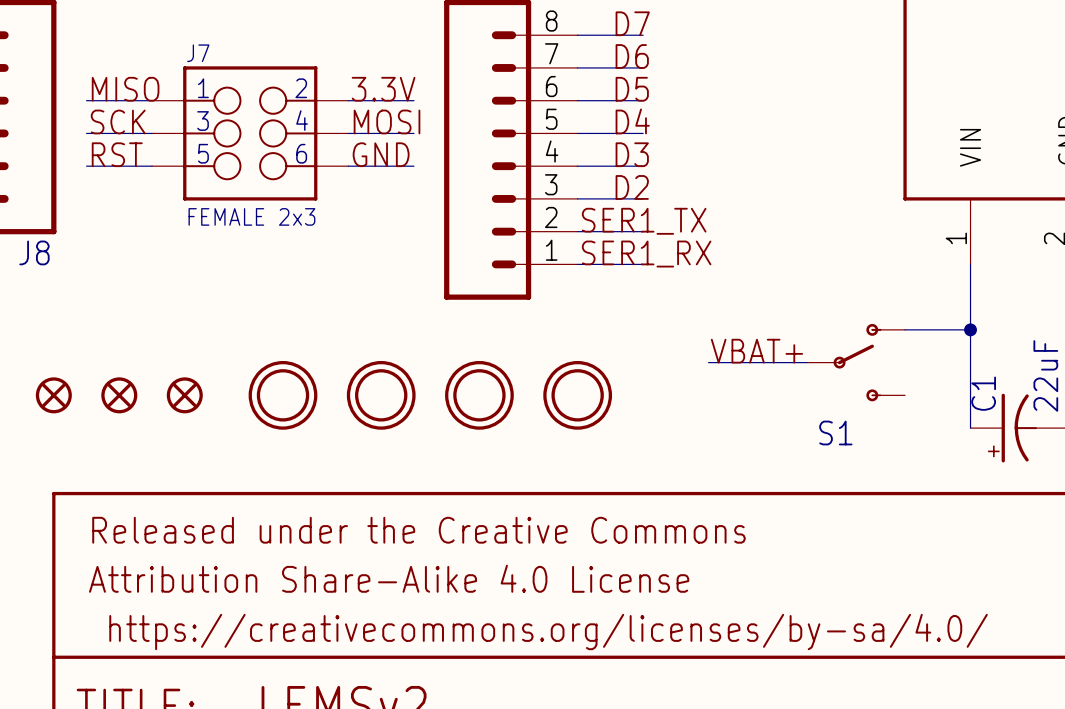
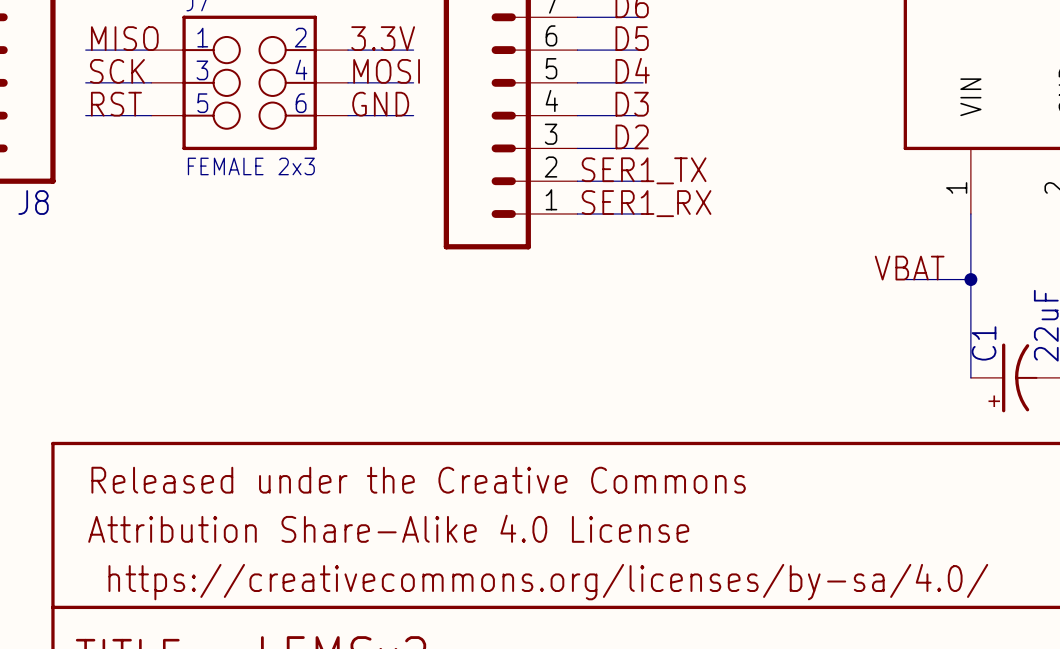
label: none -> VBAT (909, 268)
label: VBAT+ (756, 351) -> none
wire: (708, 362) (806, 362) -> none
S1: (855, 362) -> none
part: (53, 395) -> none
part: (119, 395) -> none
part: (184, 395) -> none
part: (283, 395) -> none
part: (381, 395) -> none
part: (479, 395) -> none
part: (577, 395) -> none

